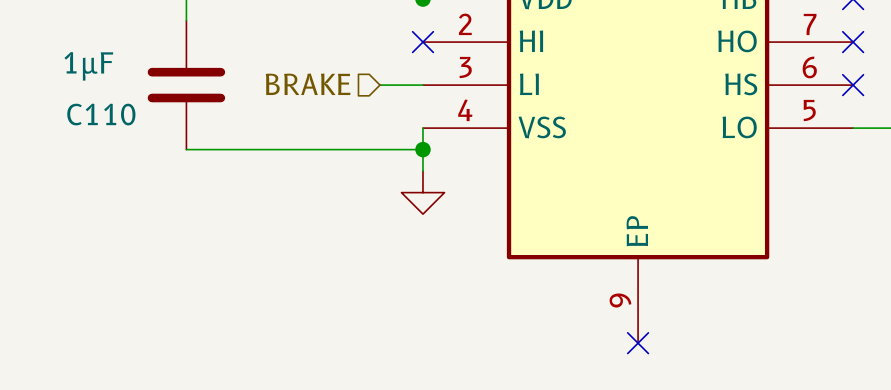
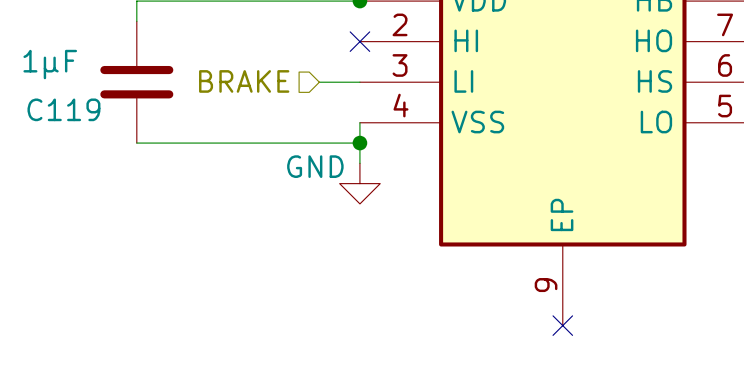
C110 name: C110 (101, 114) -> C119 (63, 109)
power symbol text: none -> GND (315, 166)

